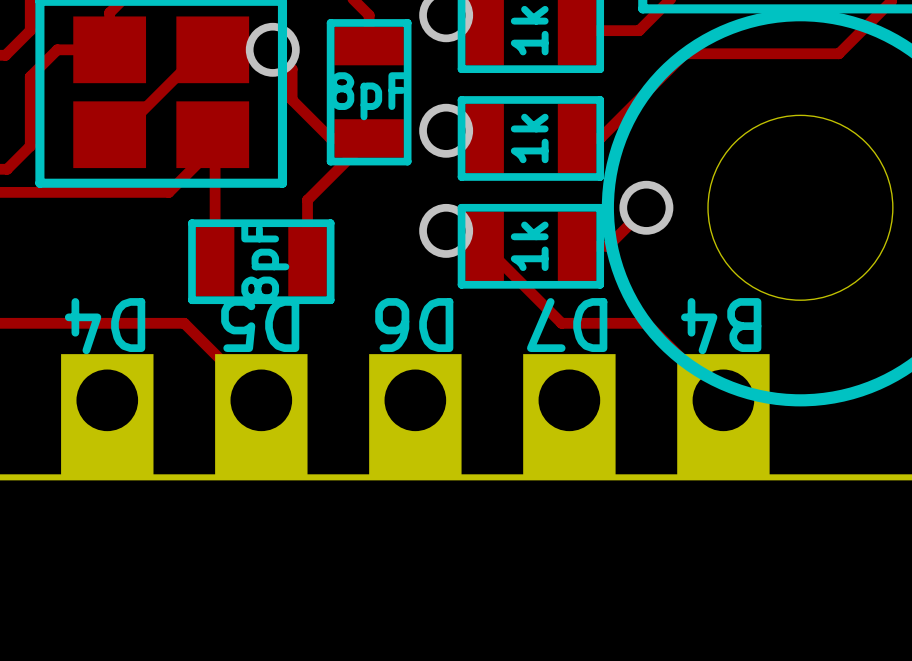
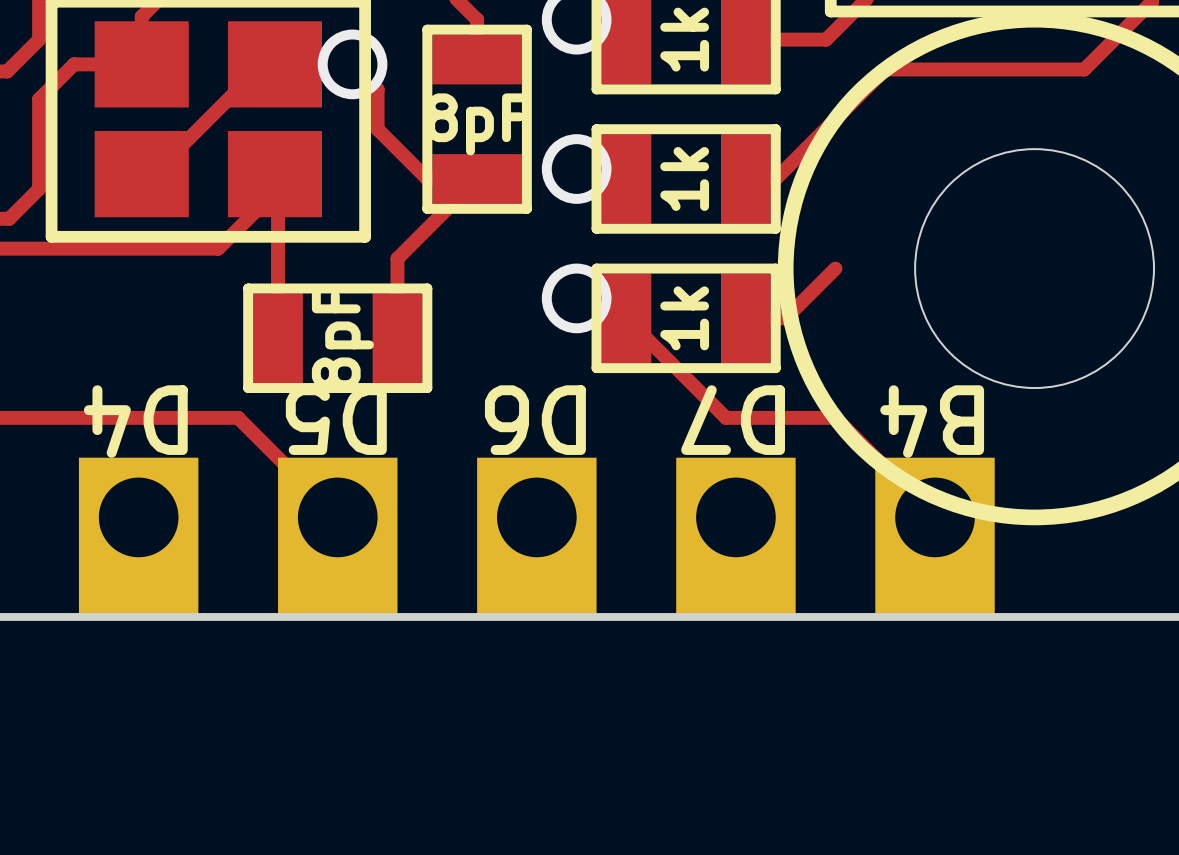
via: (646, 207) -> none

